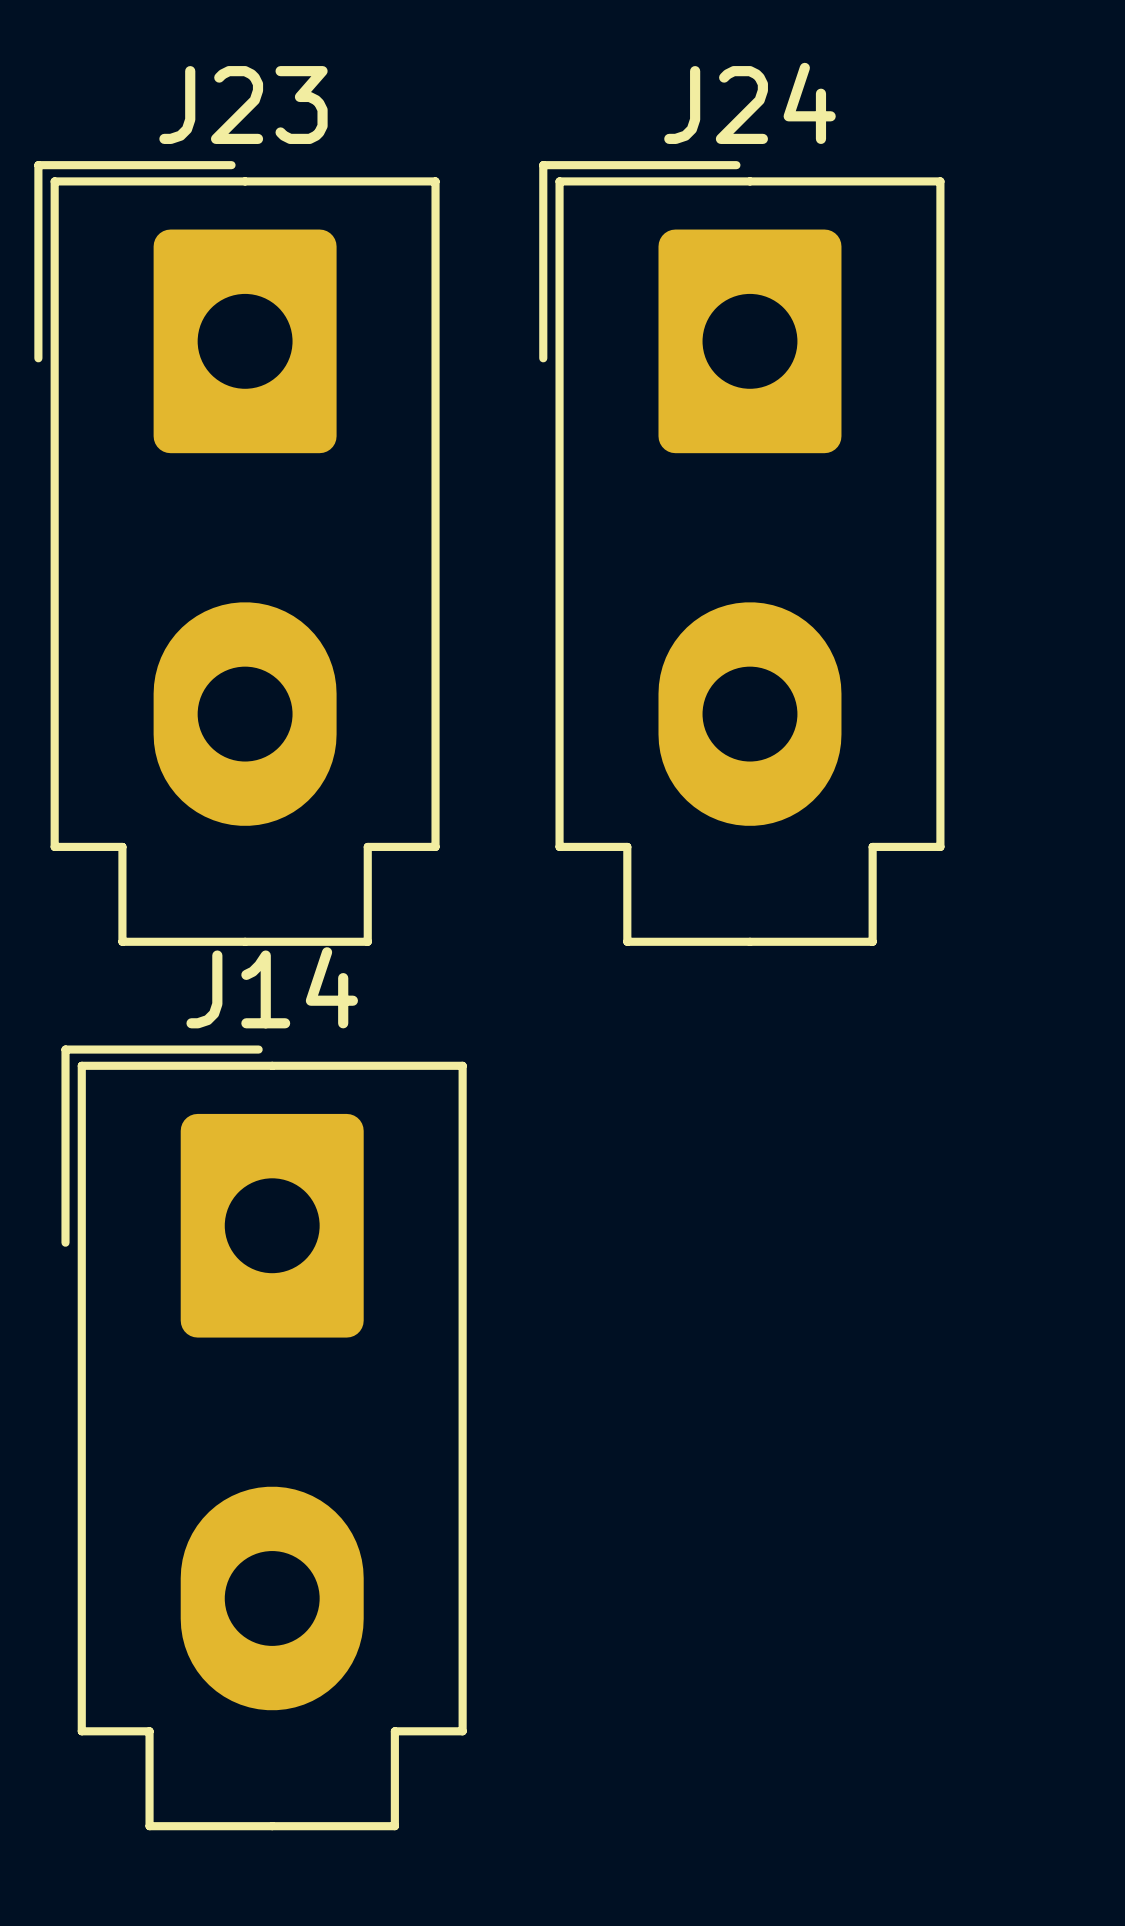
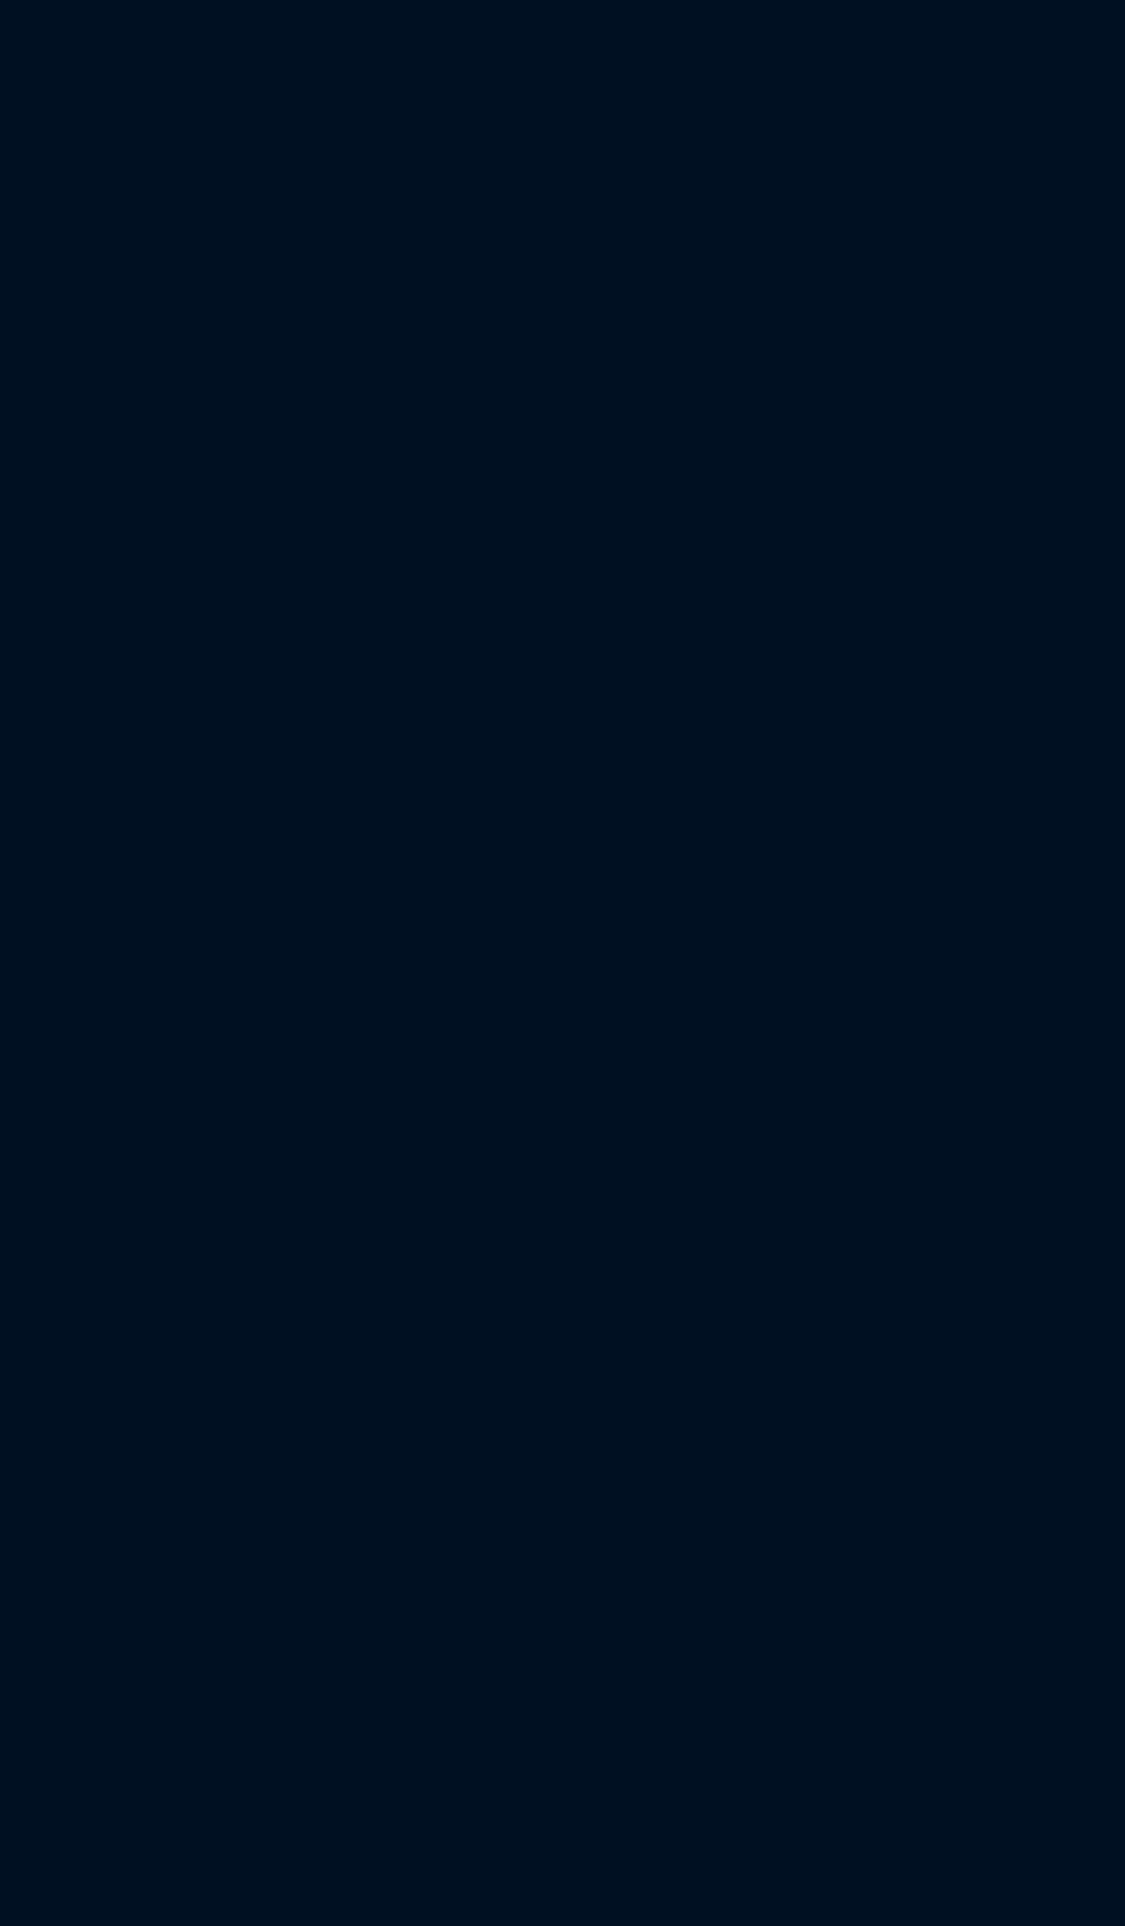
J23: (236, 553) -> none
J24: (741, 553) -> none
J14: (264, 1437) -> none

